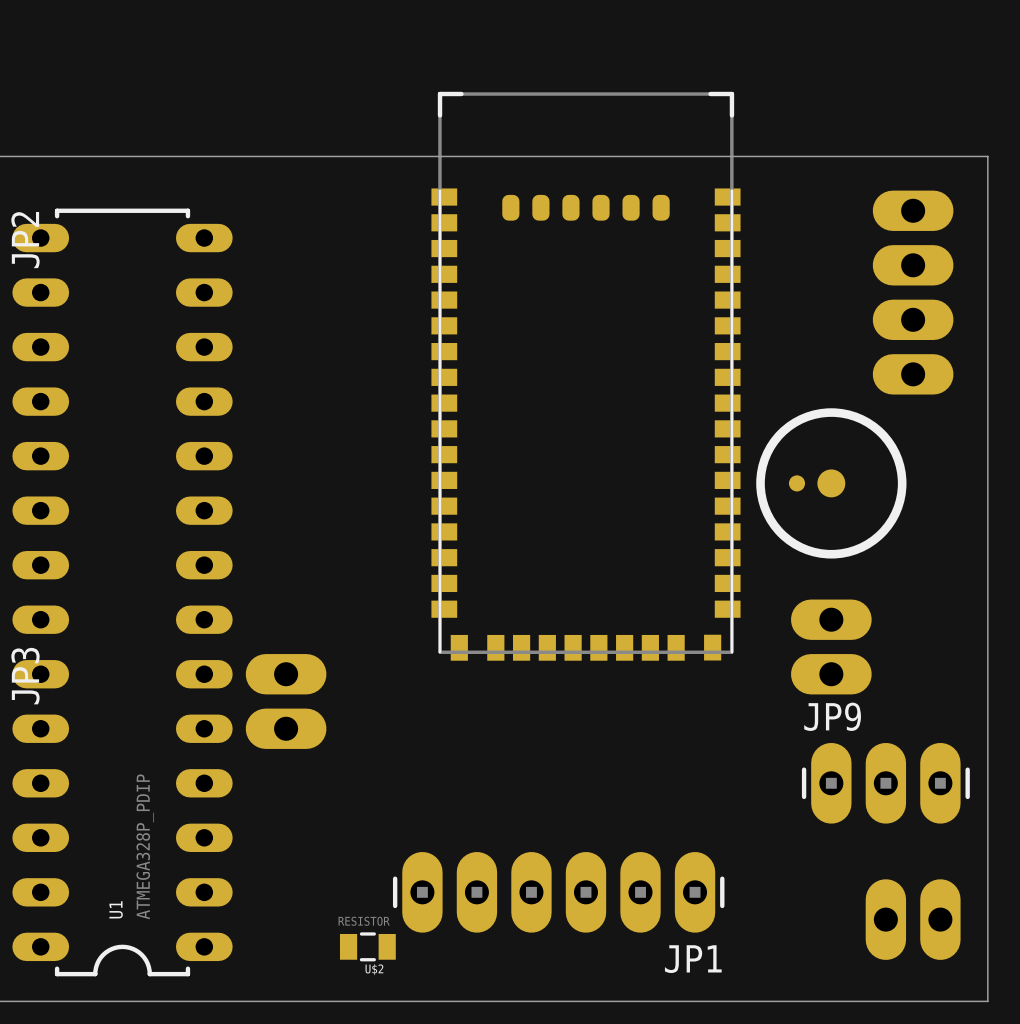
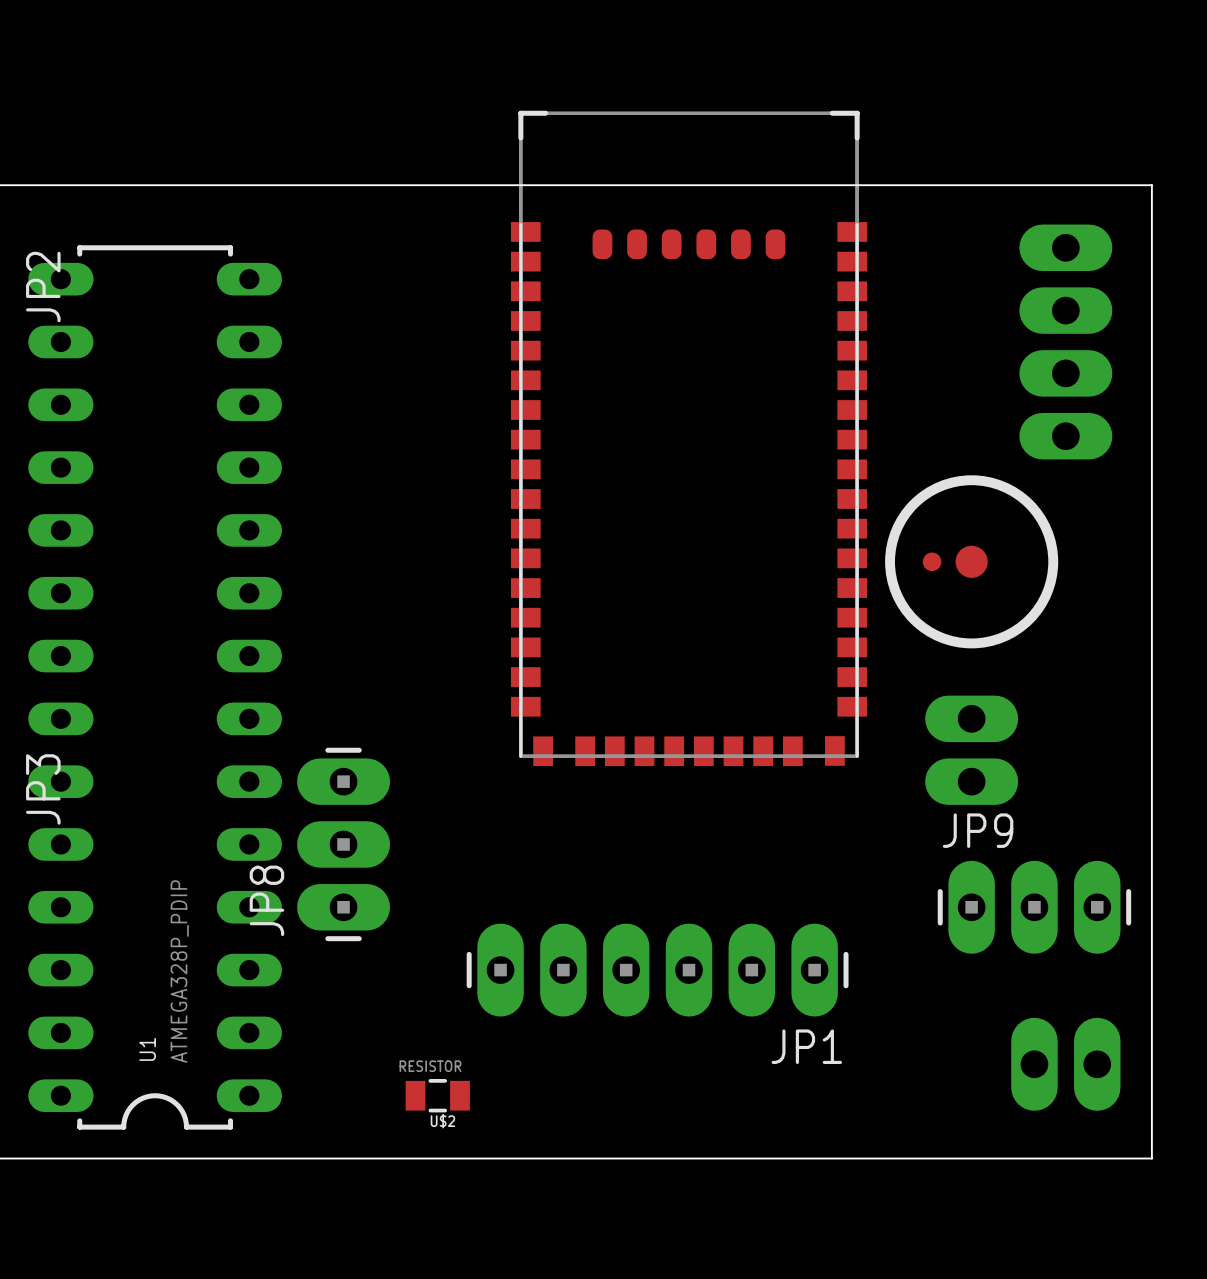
part: (286, 701) -> none
JP8: none -> (343, 844)
JP1 position: (558, 892) -> (657, 970)

